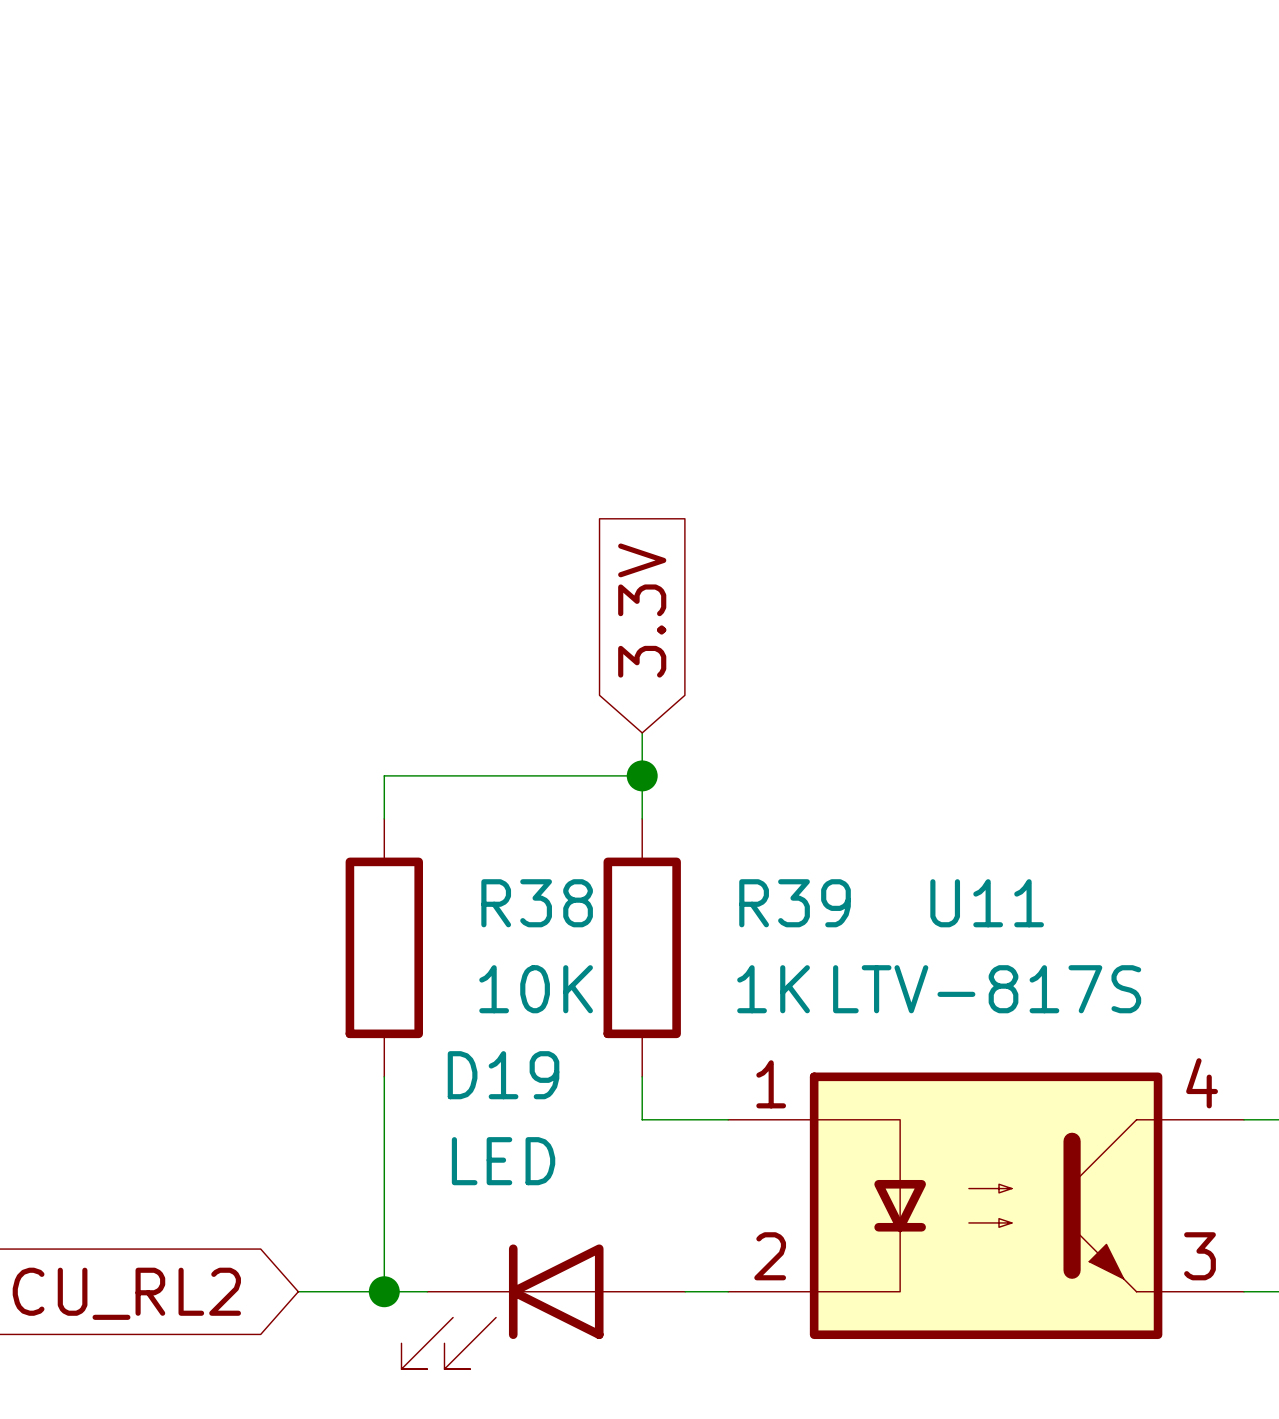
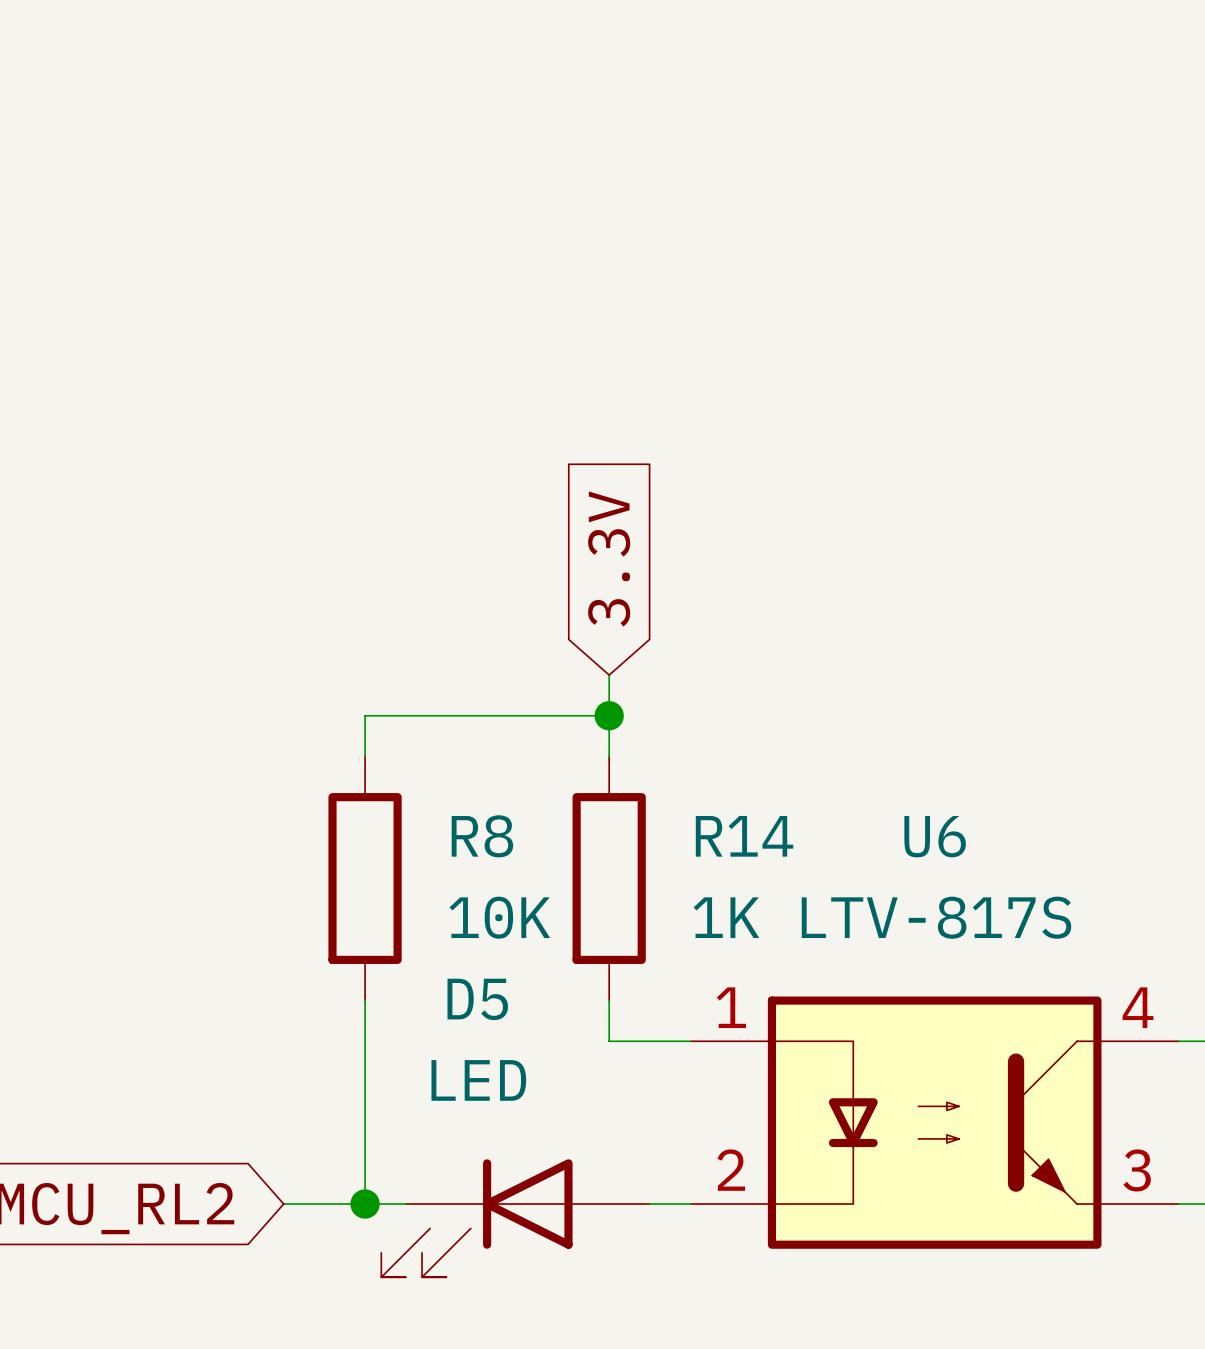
R38 name: R38 (537, 903) -> R8 (482, 836)
R39 name: R39 (795, 903) -> R14 (744, 836)
U11 name: U11 (987, 903) -> U6 (935, 836)
D19 name: D19 (503, 1075) -> D5 (477, 999)

